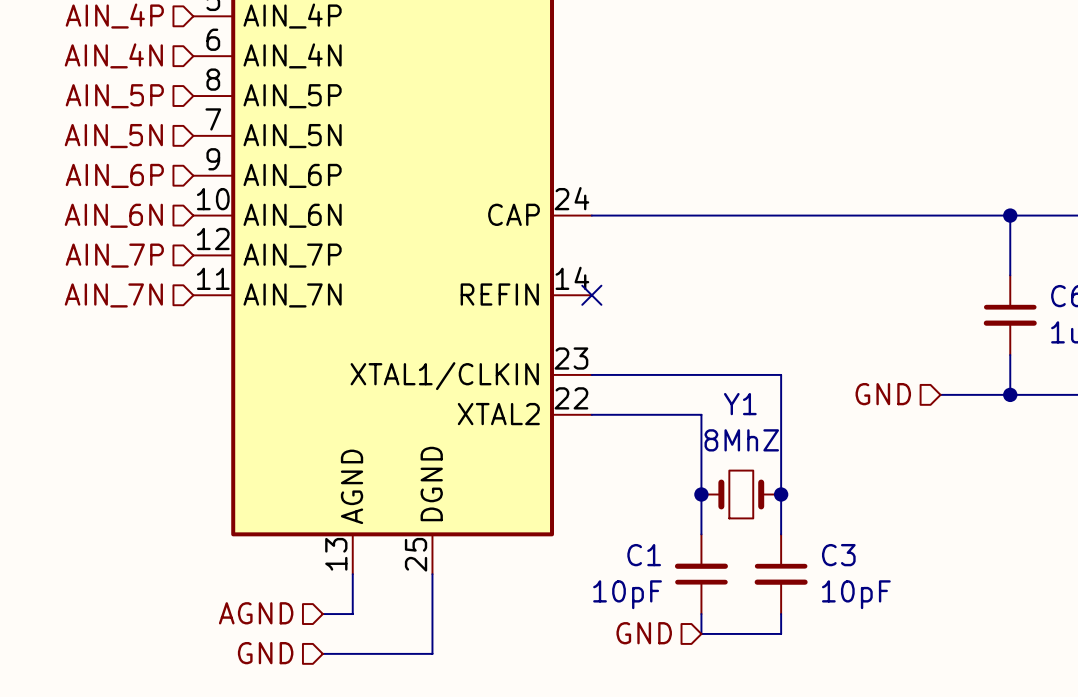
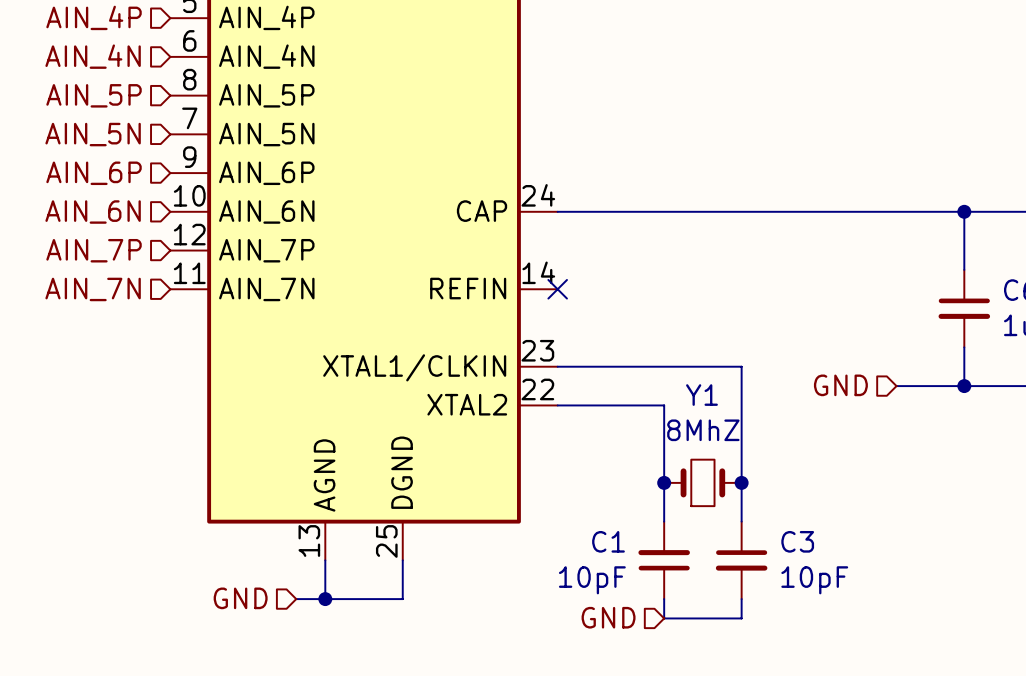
hierarchical label: AGND (256, 613) -> GND (240, 598)
junction: none -> (325, 599)
wire: (432, 614) (432, 653) (322, 653) -> (402, 599) (325, 599)
hierarchical label: GND (265, 653) -> none

